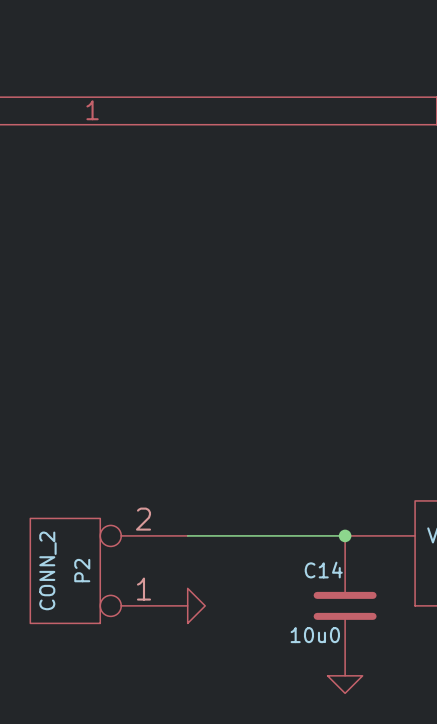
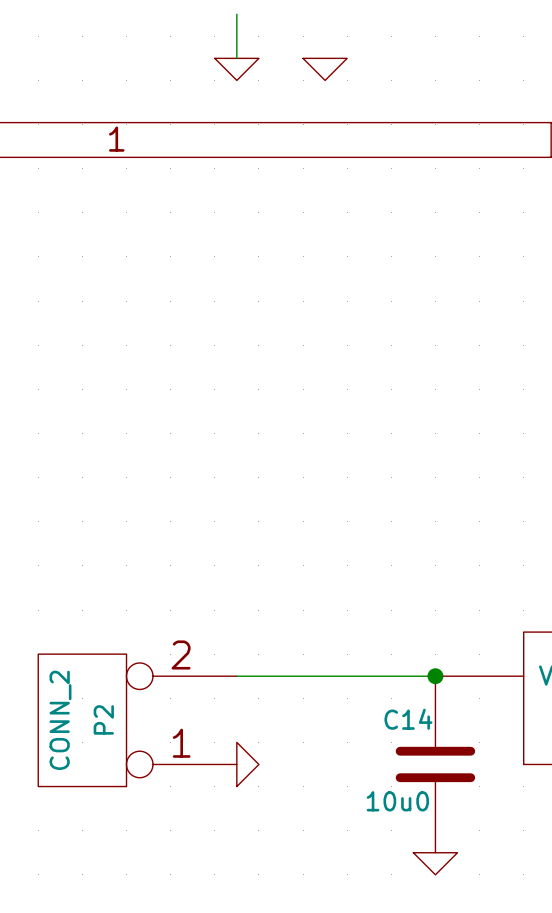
wire: none -> (236, 14) (236, 58)
power symbol: none -> (236, 69)
power symbol: none -> (325, 69)

